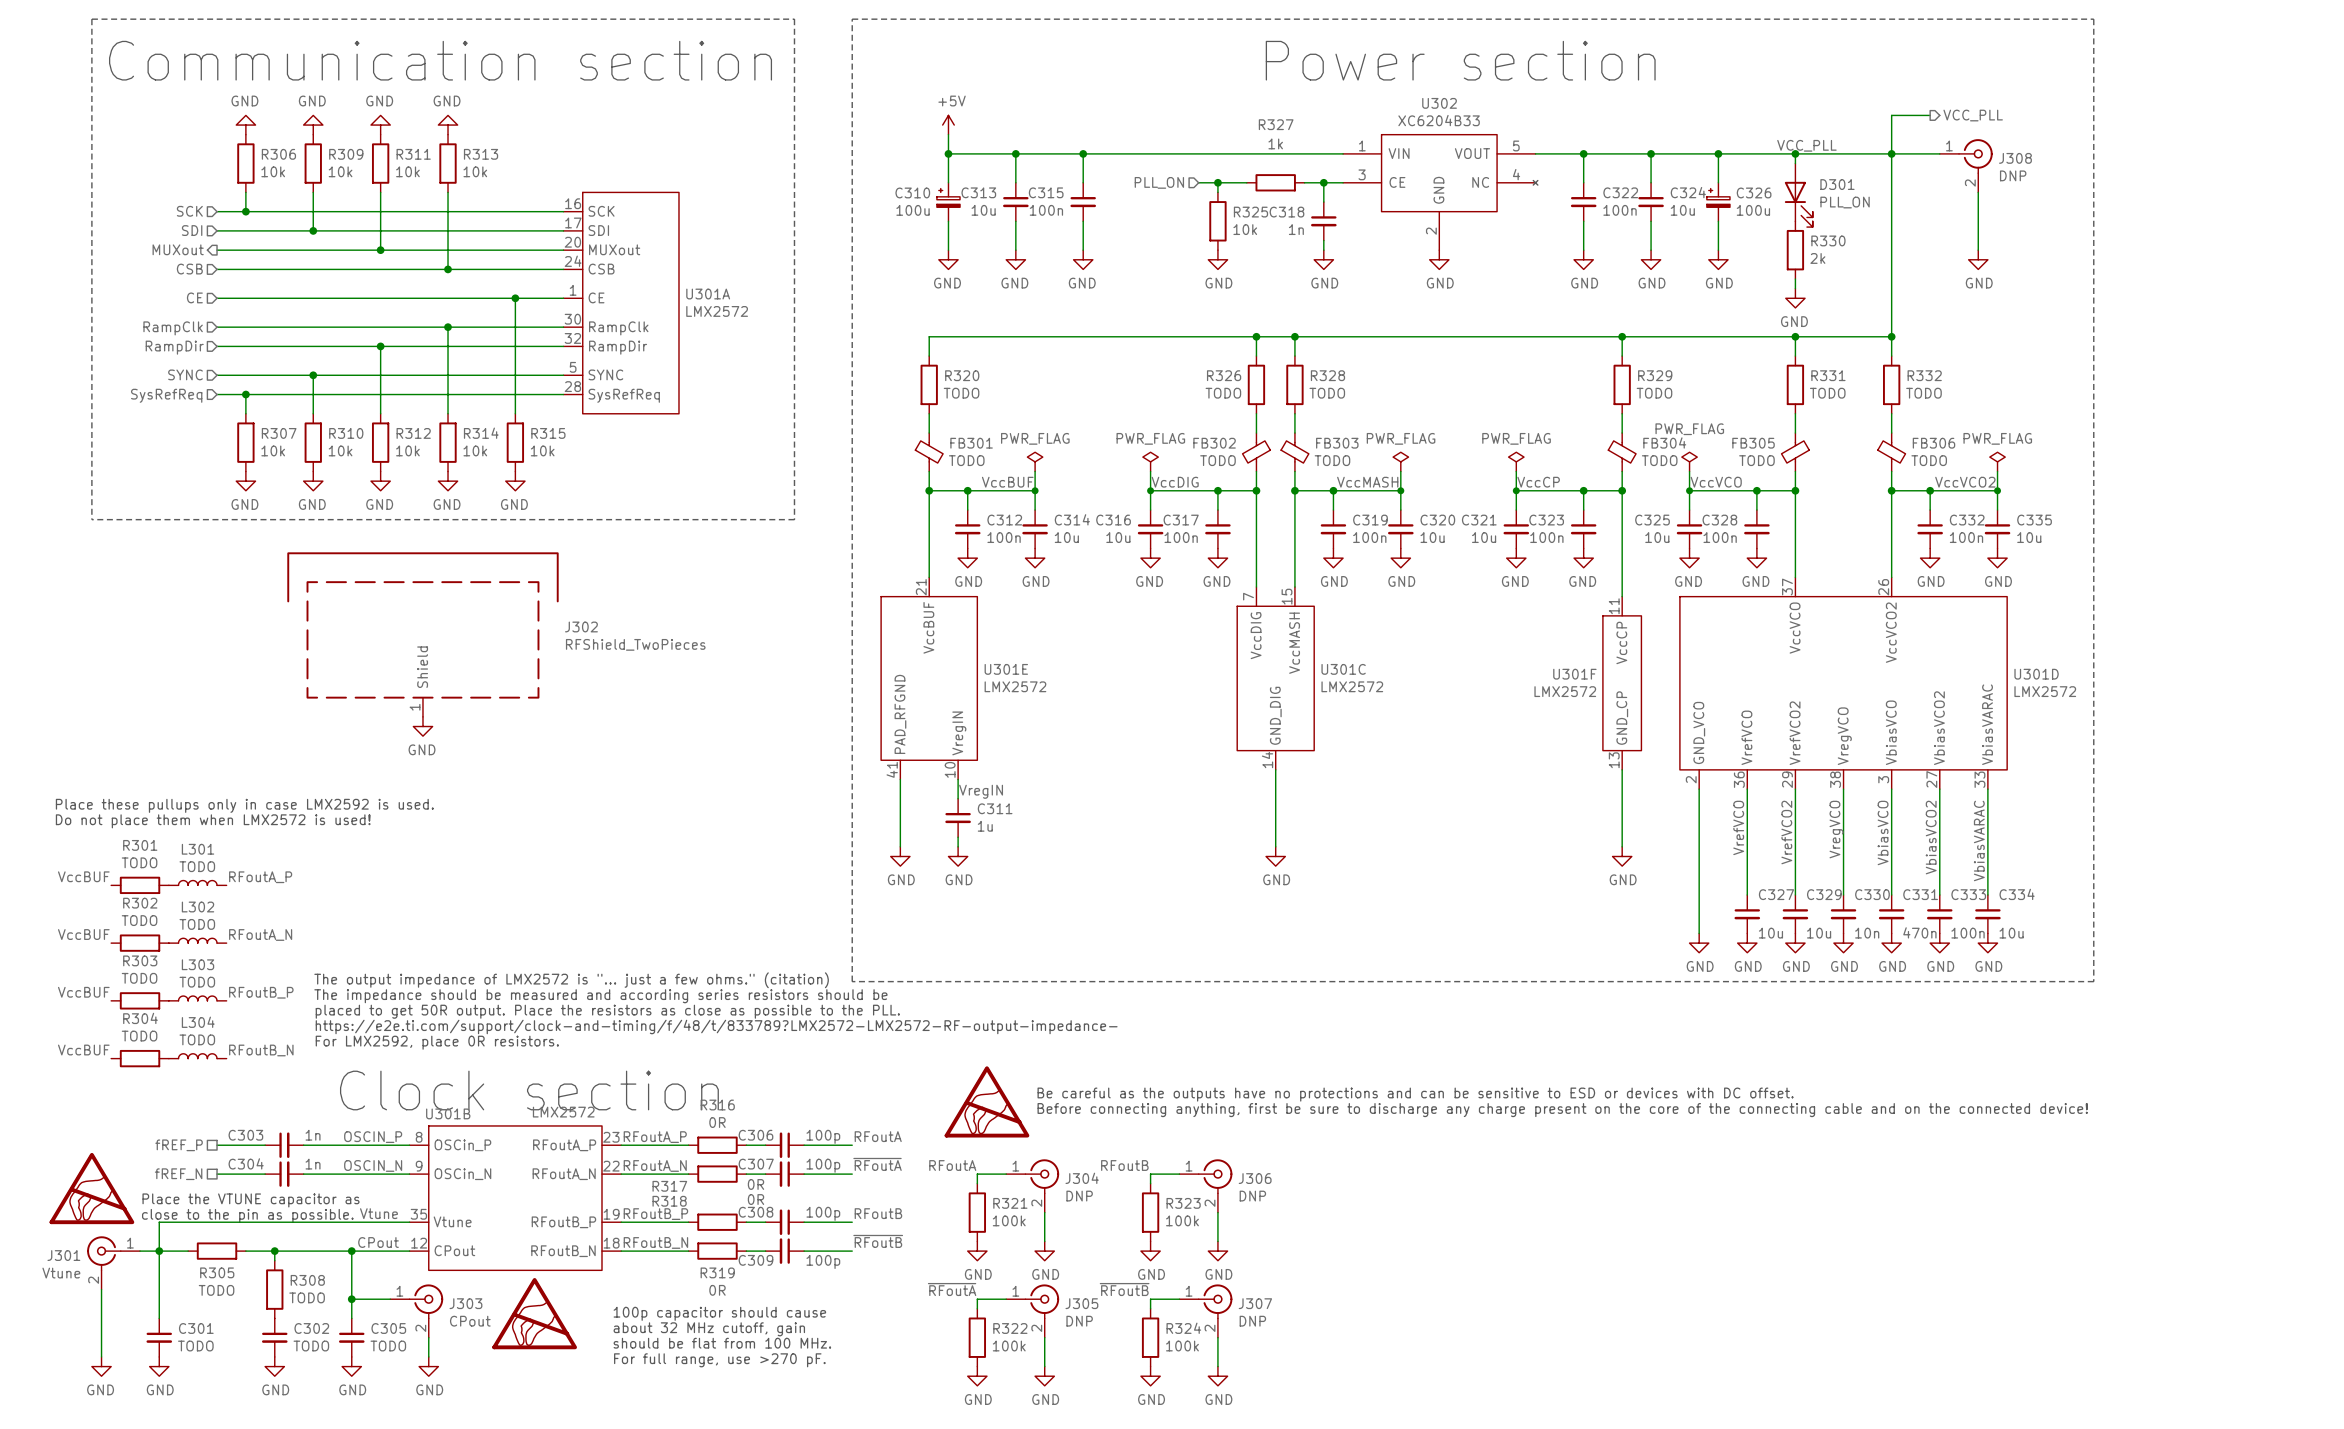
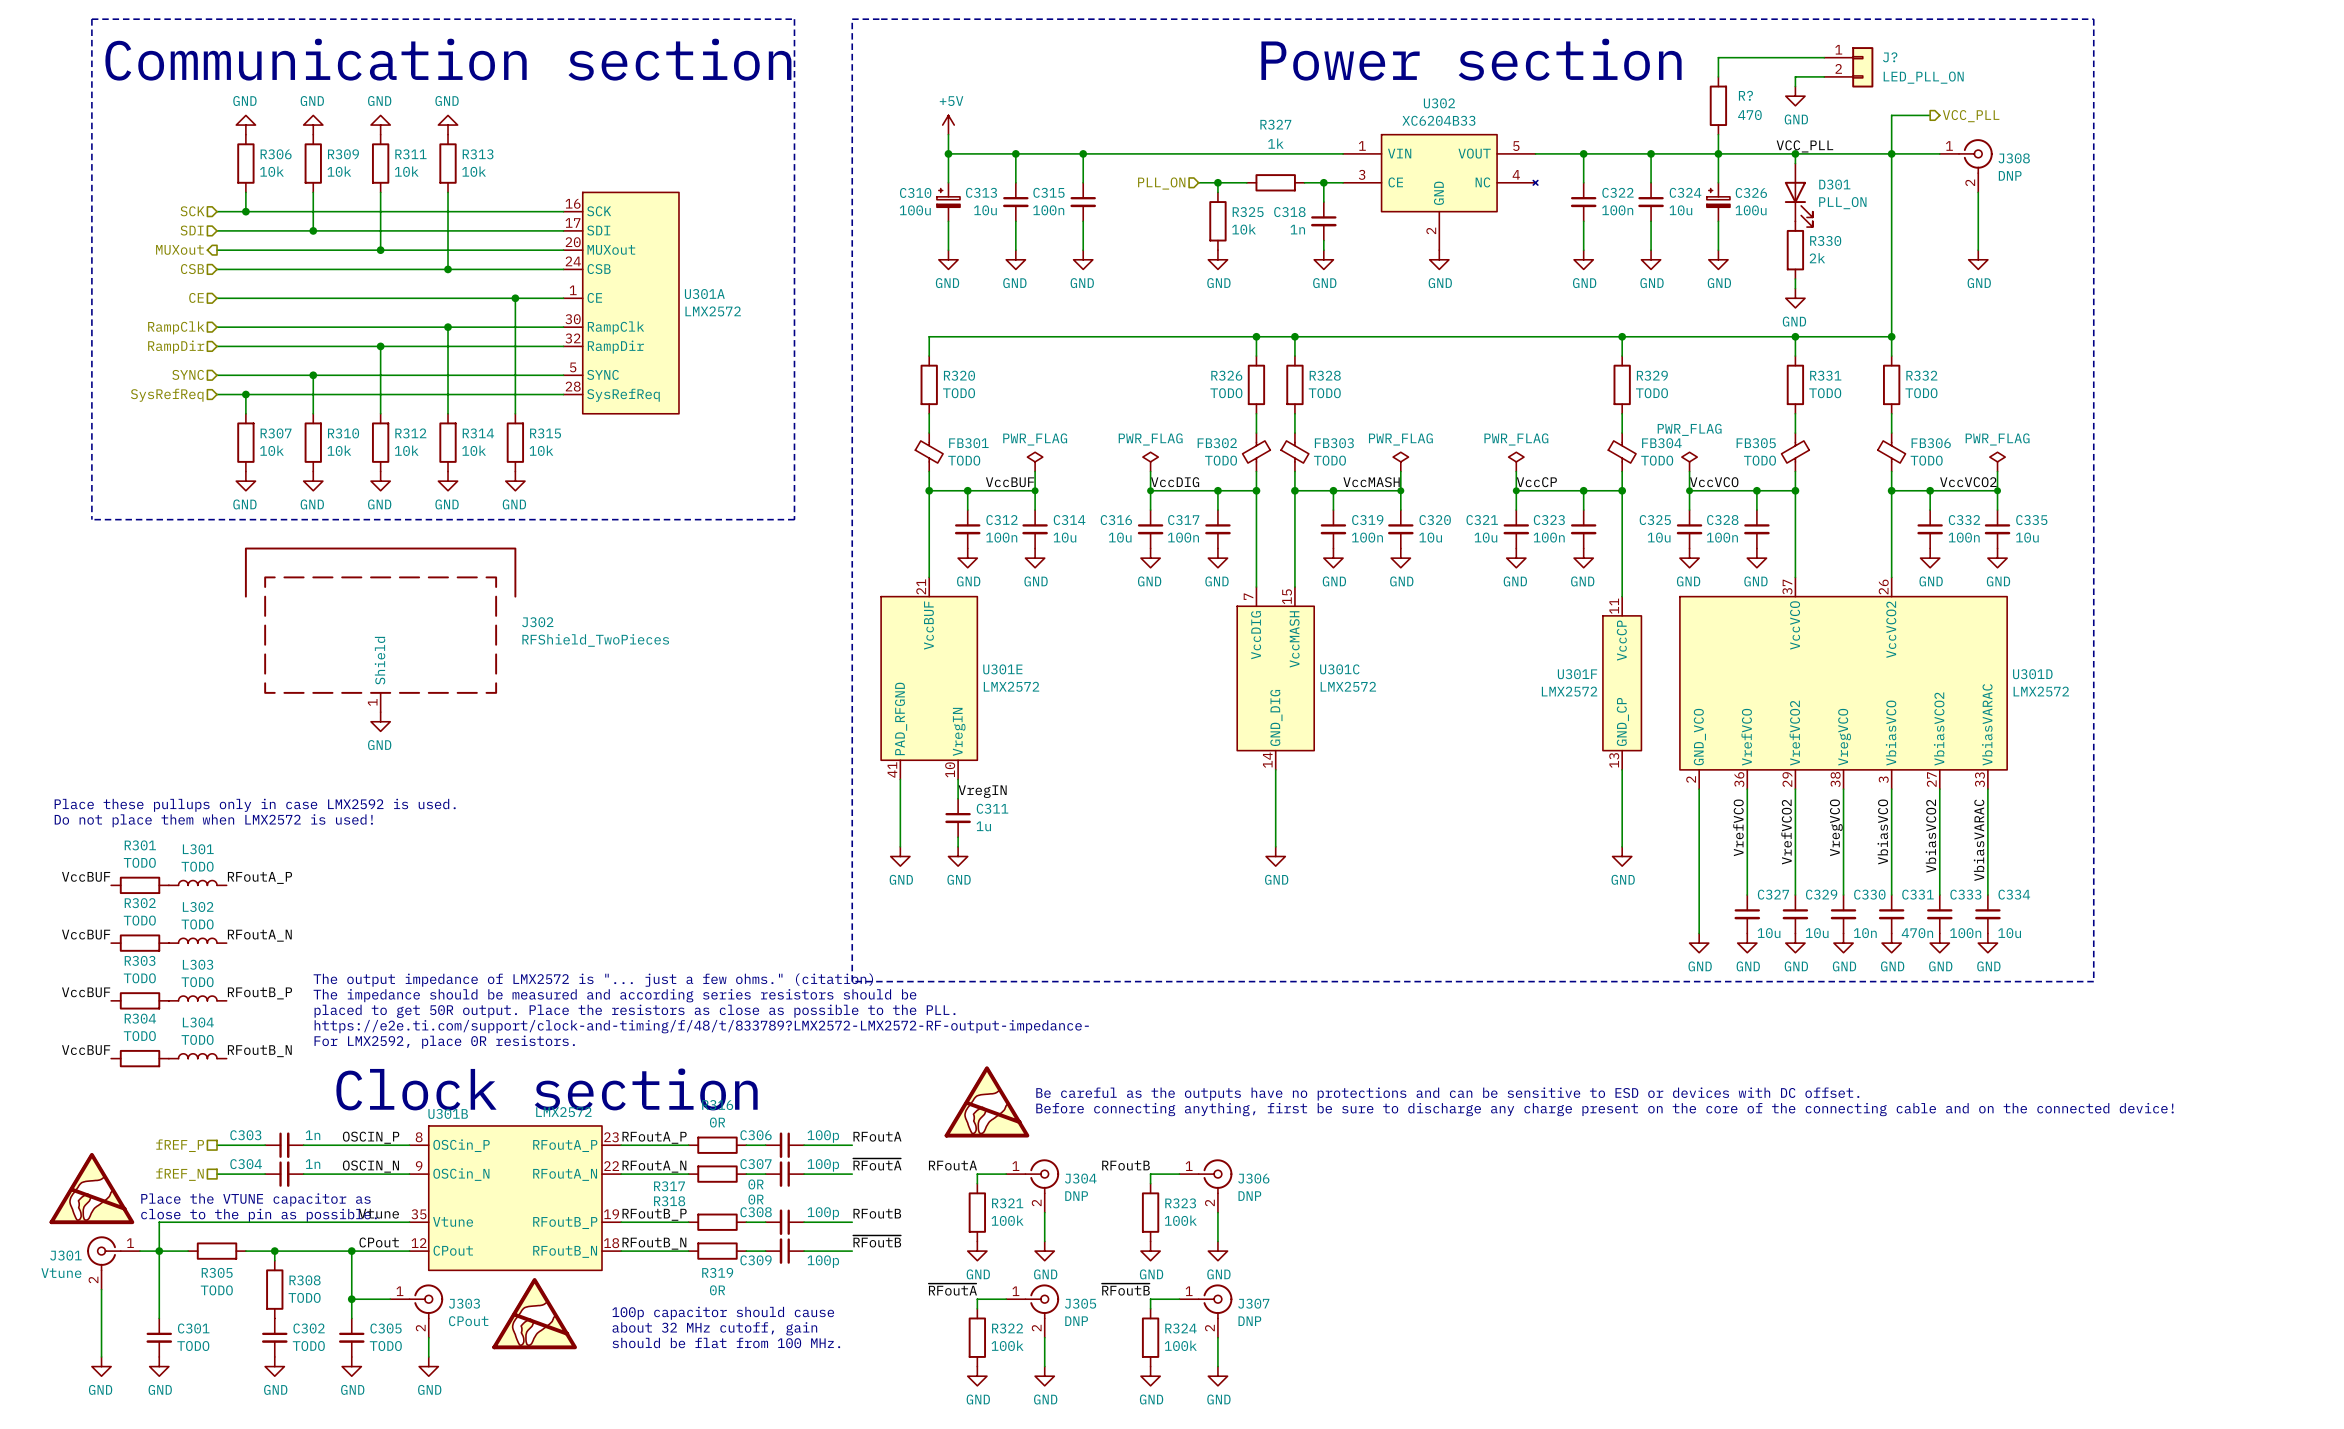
wire: none -> (1824, 57) (1718, 57) (1718, 76)
J?: none -> LED_PLL_ON (1848, 67)
wire: none -> (1824, 76) (1795, 76) (1795, 86)
power symbol: none -> GND (1795, 96)
R?: none -> 470 (1718, 105)
wire: none -> (1718, 134) (1718, 153)
J302 position: (422, 634) -> (380, 629)
power symbol position: GND (422, 726) -> GND (380, 721)
text: For full range, use >270 pF. (719, 1360) -> none

